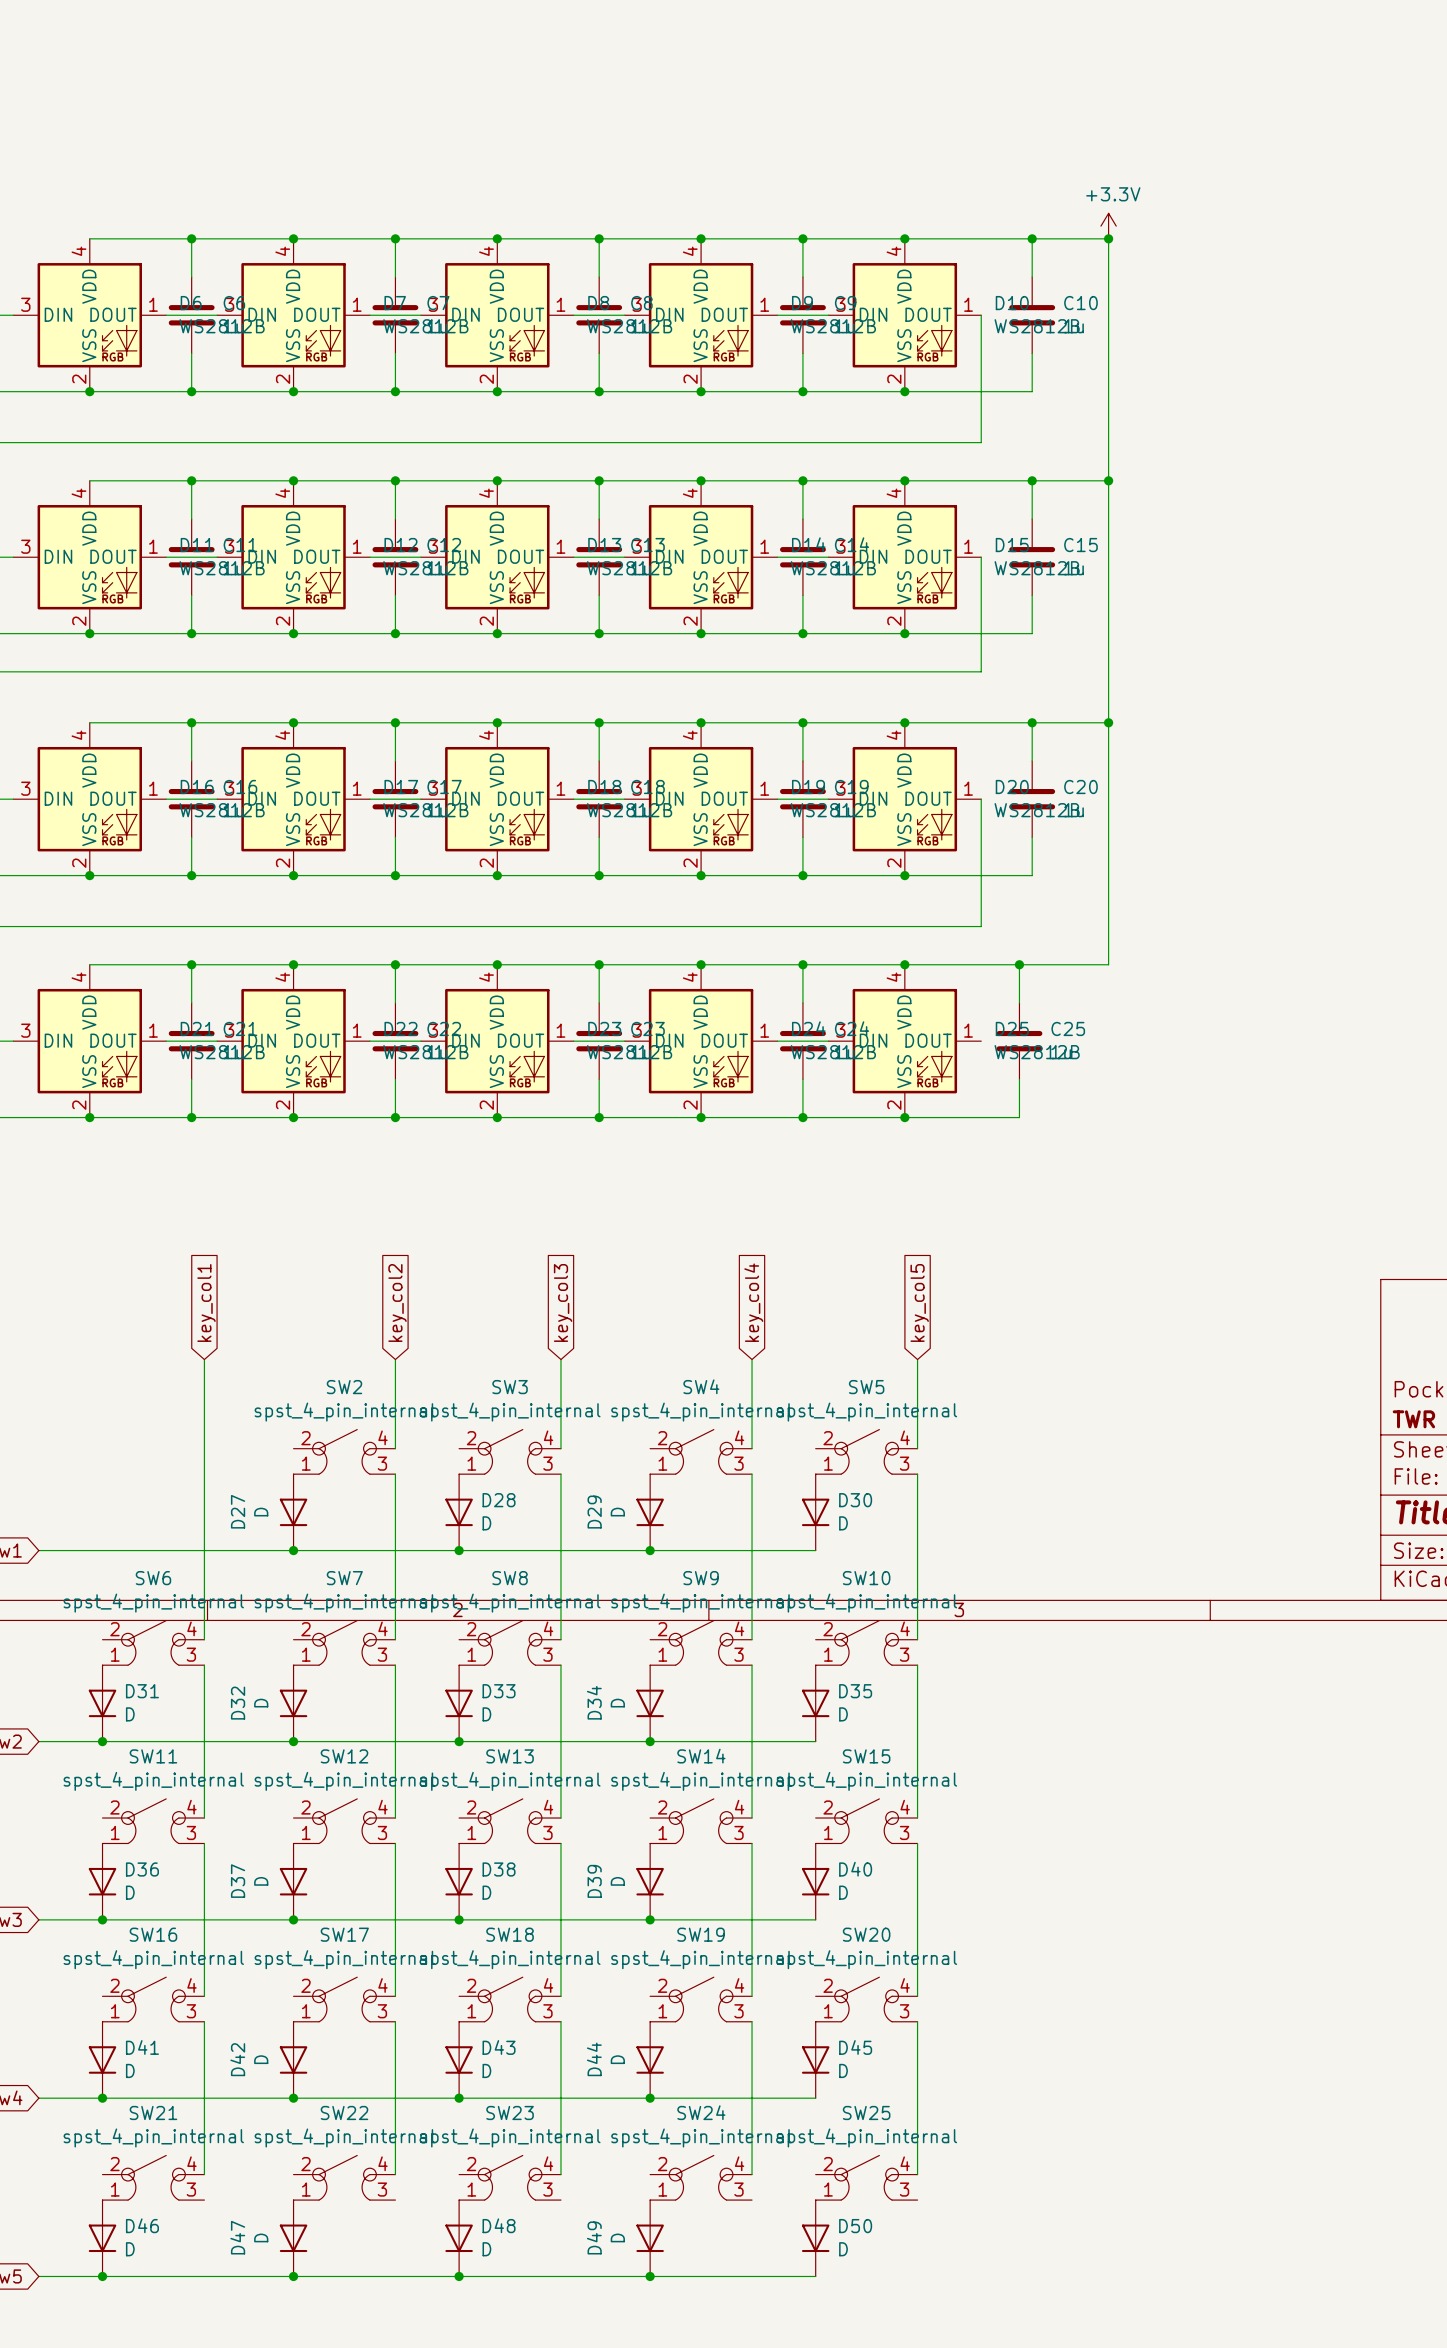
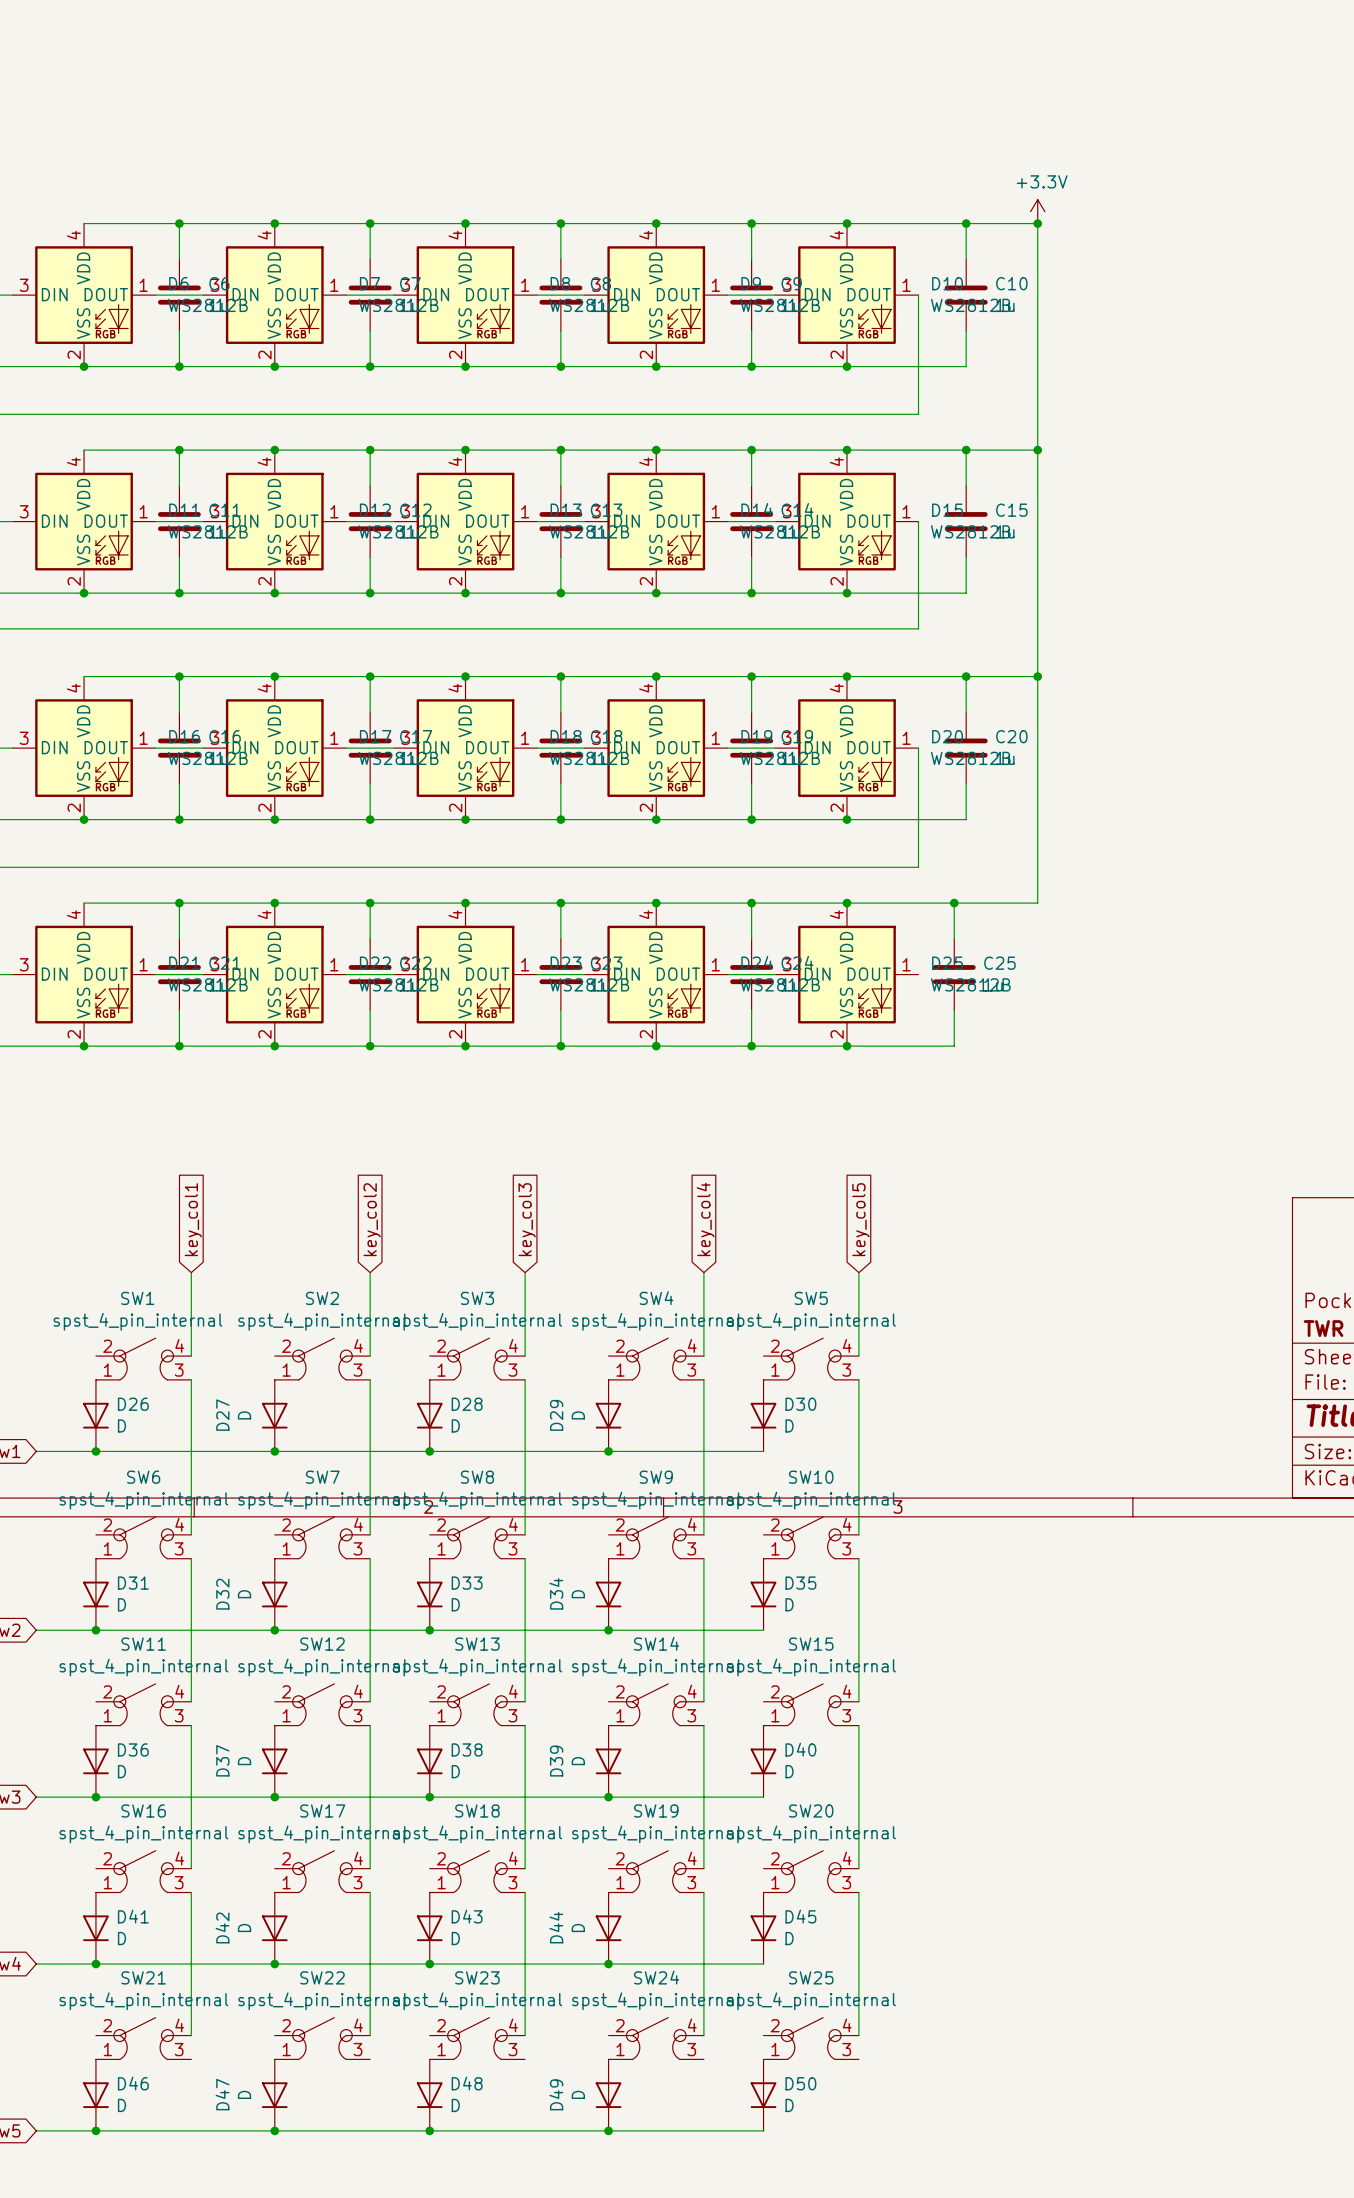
wire: (204, 1448) (204, 1474) -> none
SW1: none -> spst_4_pin_internal (143, 1359)
D26: none -> D (95, 1415)
junction: none -> (95, 1451)

